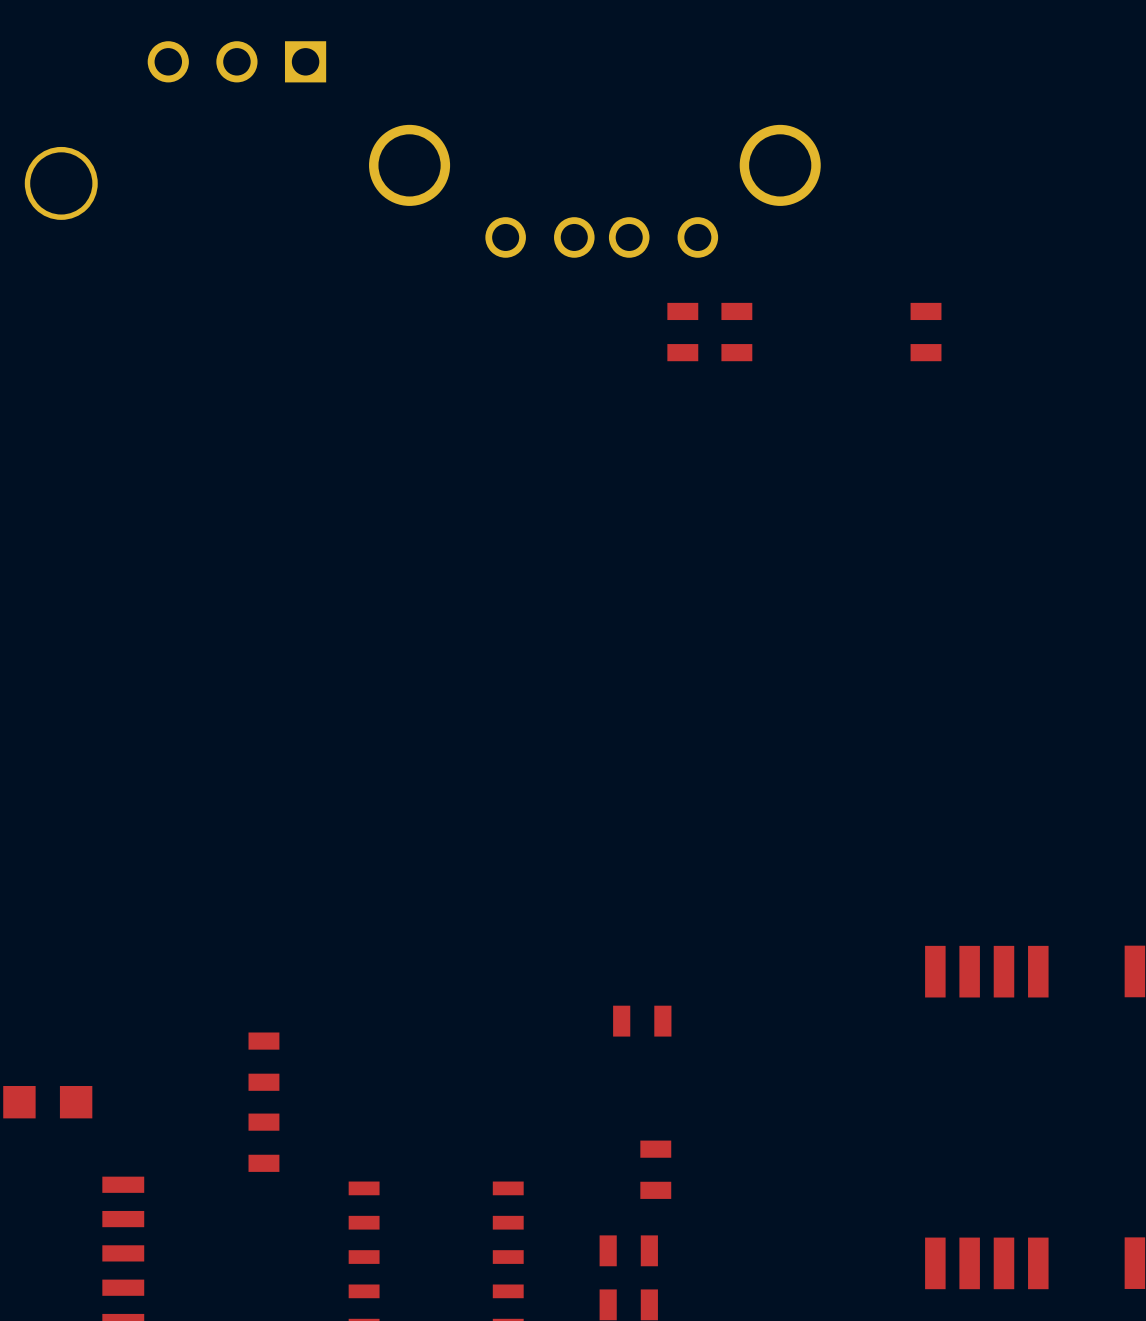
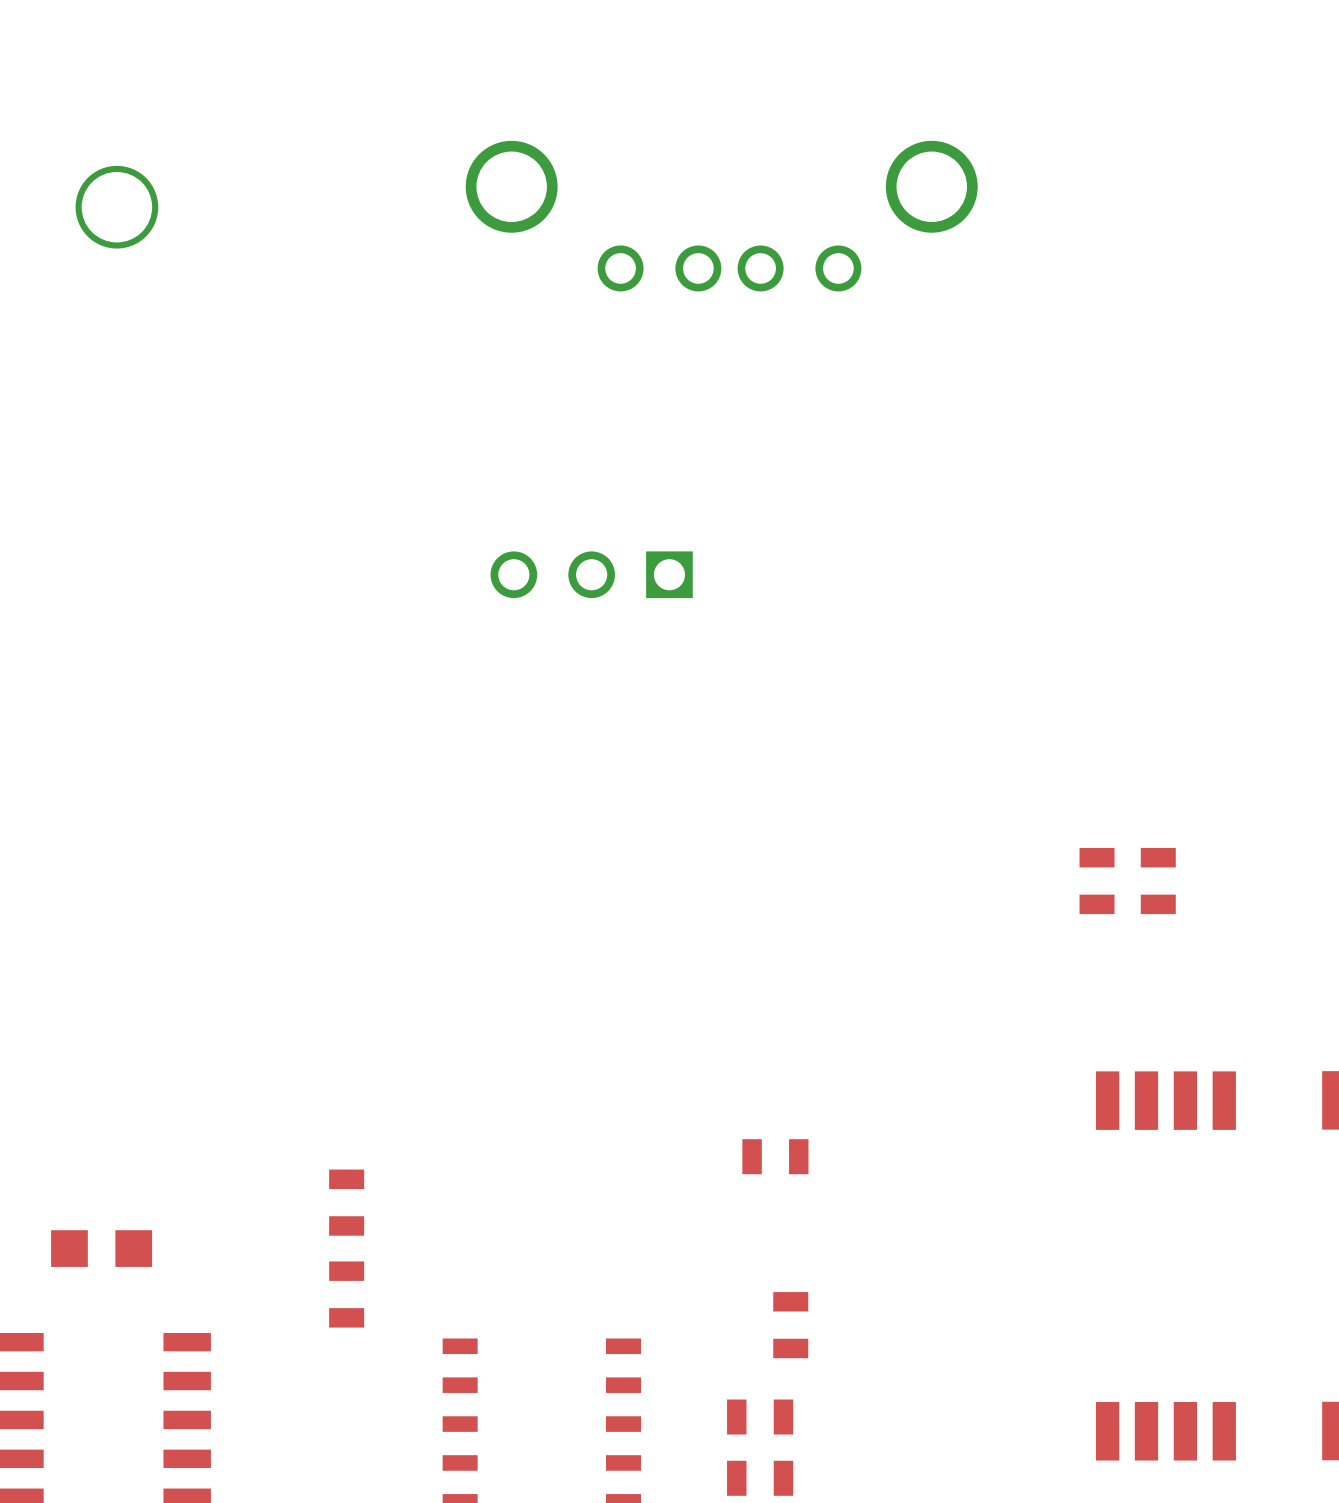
part position: (236, 61) -> (591, 574)
part: (682, 332) -> none
part: (736, 332) -> none
part: (926, 332) -> none
part: none -> (1097, 881)
part: none -> (1158, 881)

